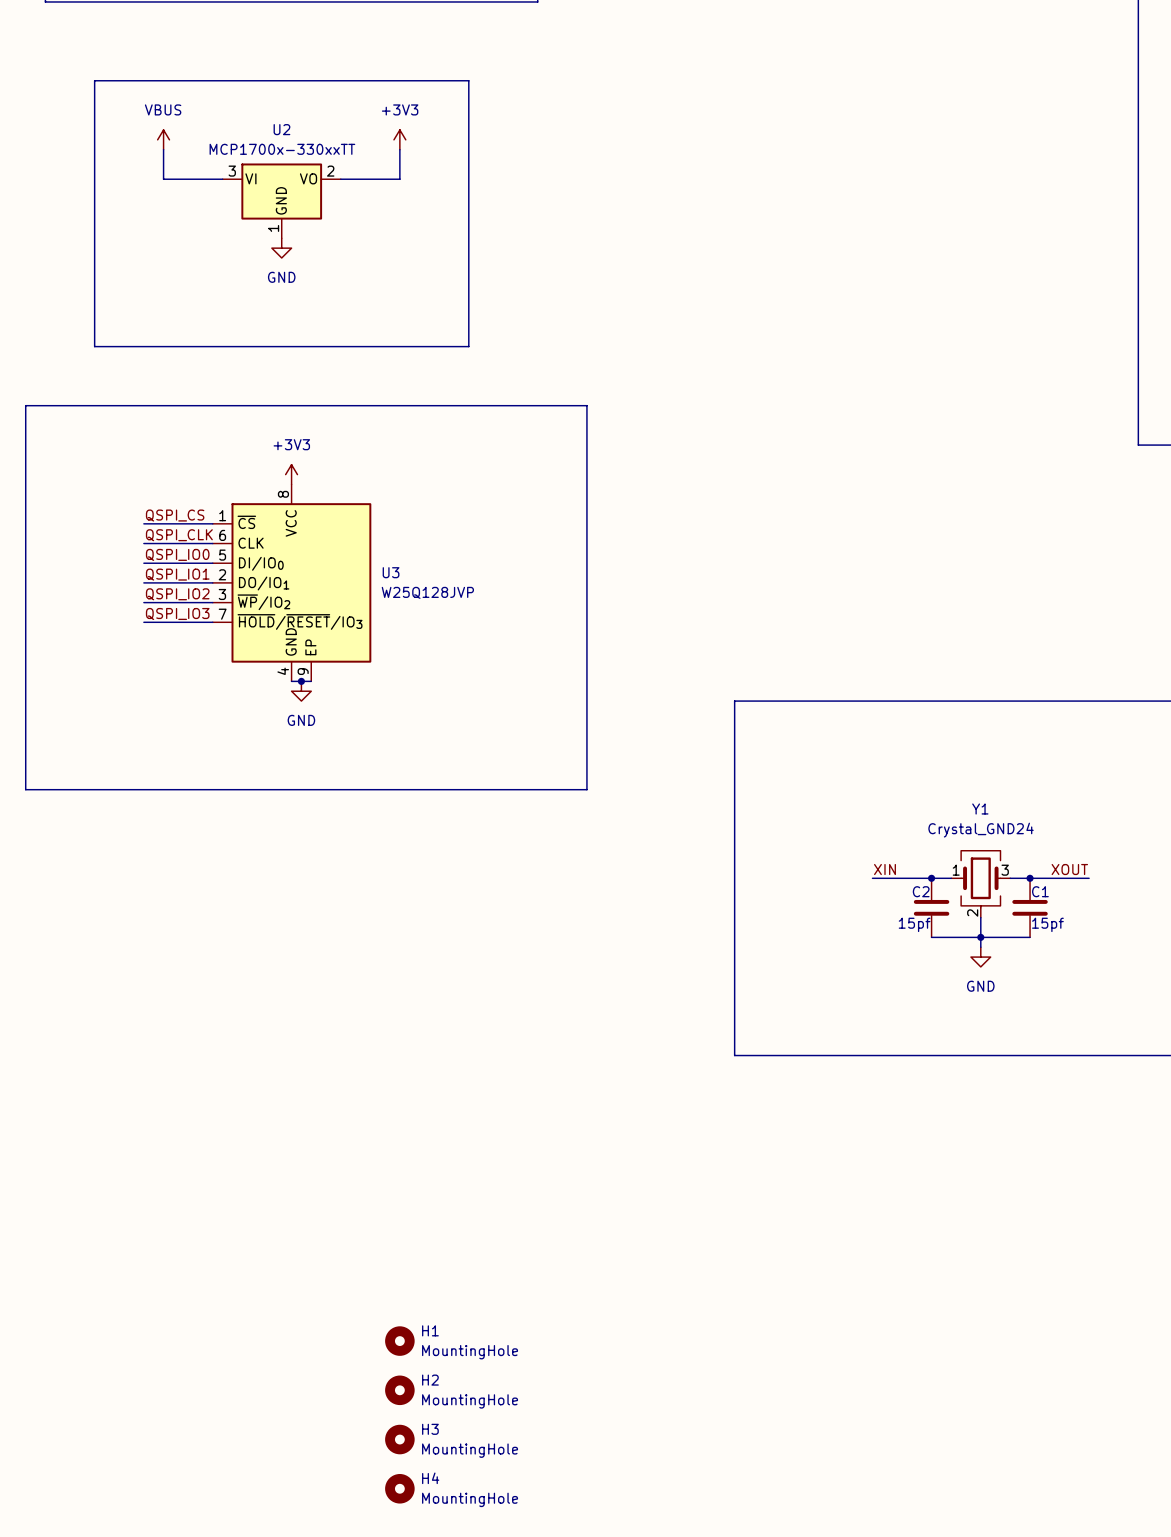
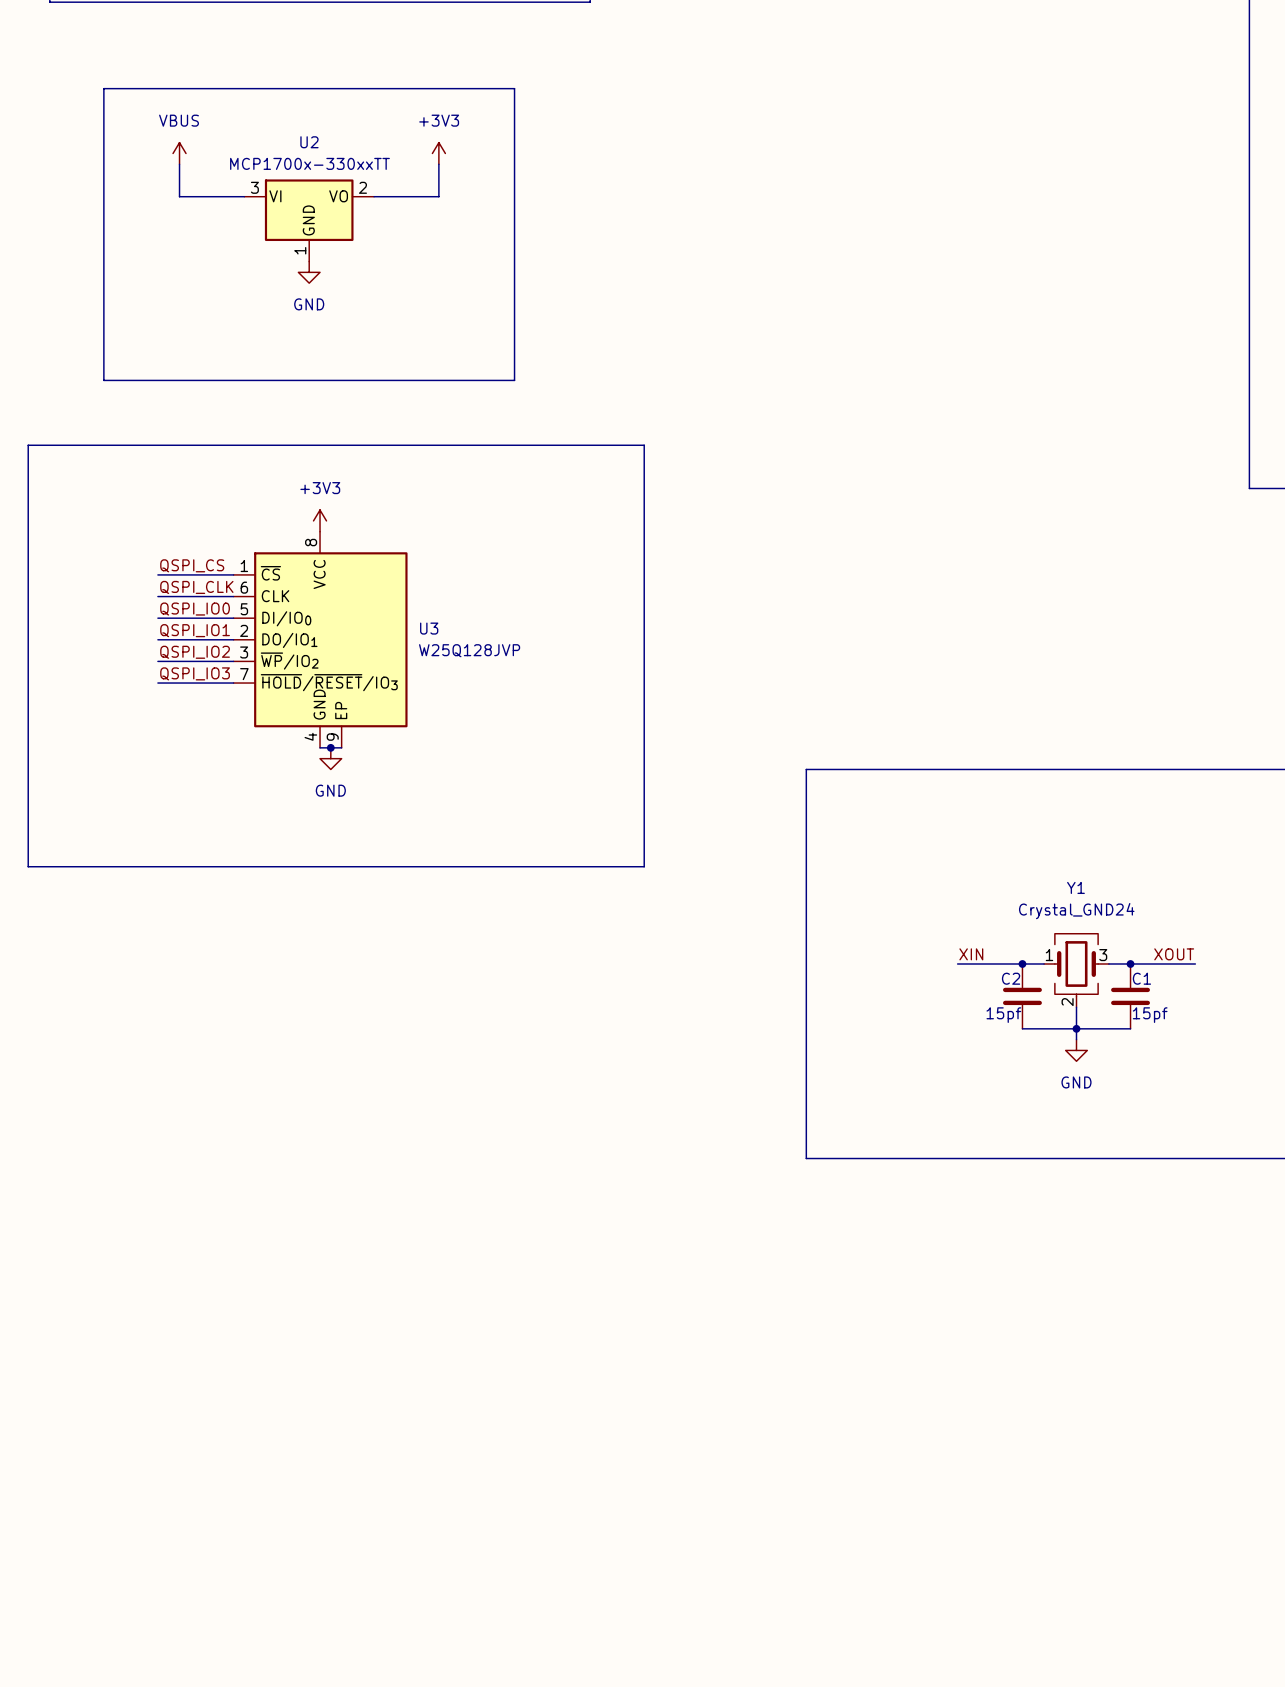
H1: MountingHole (399, 1341) -> none
H2: MountingHole (399, 1390) -> none
H3: MountingHole (399, 1439) -> none
H4: MountingHole (399, 1488) -> none

